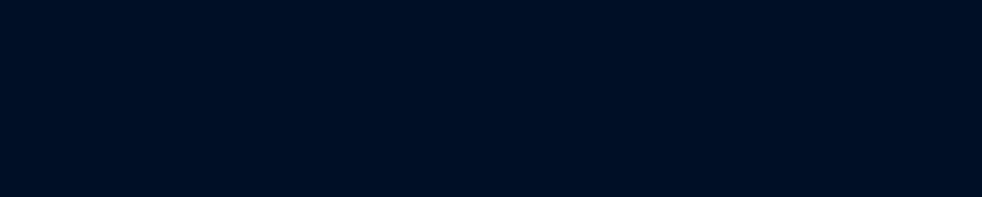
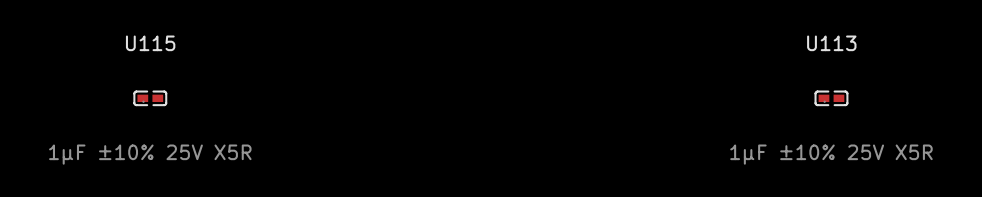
U115: none -> 1µF ±10% 25V X5R (150, 98)
U113: none -> 1µF ±10% 25V X5R (831, 98)

